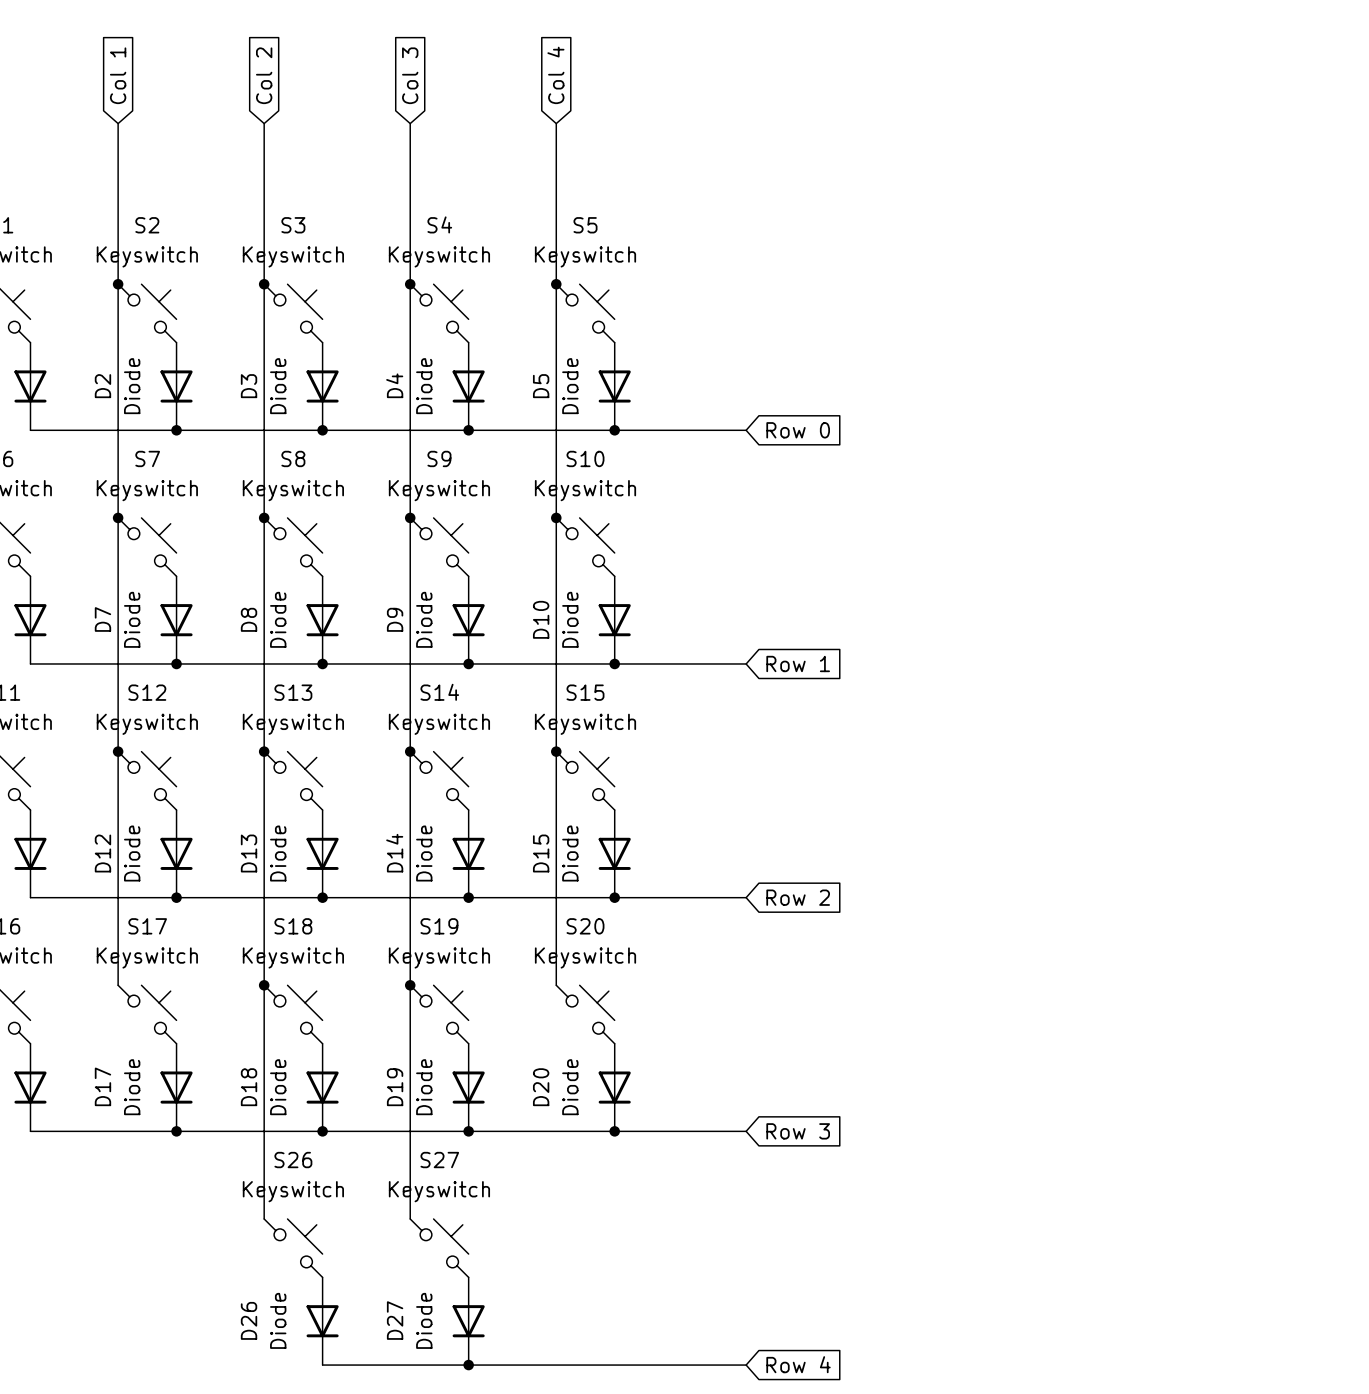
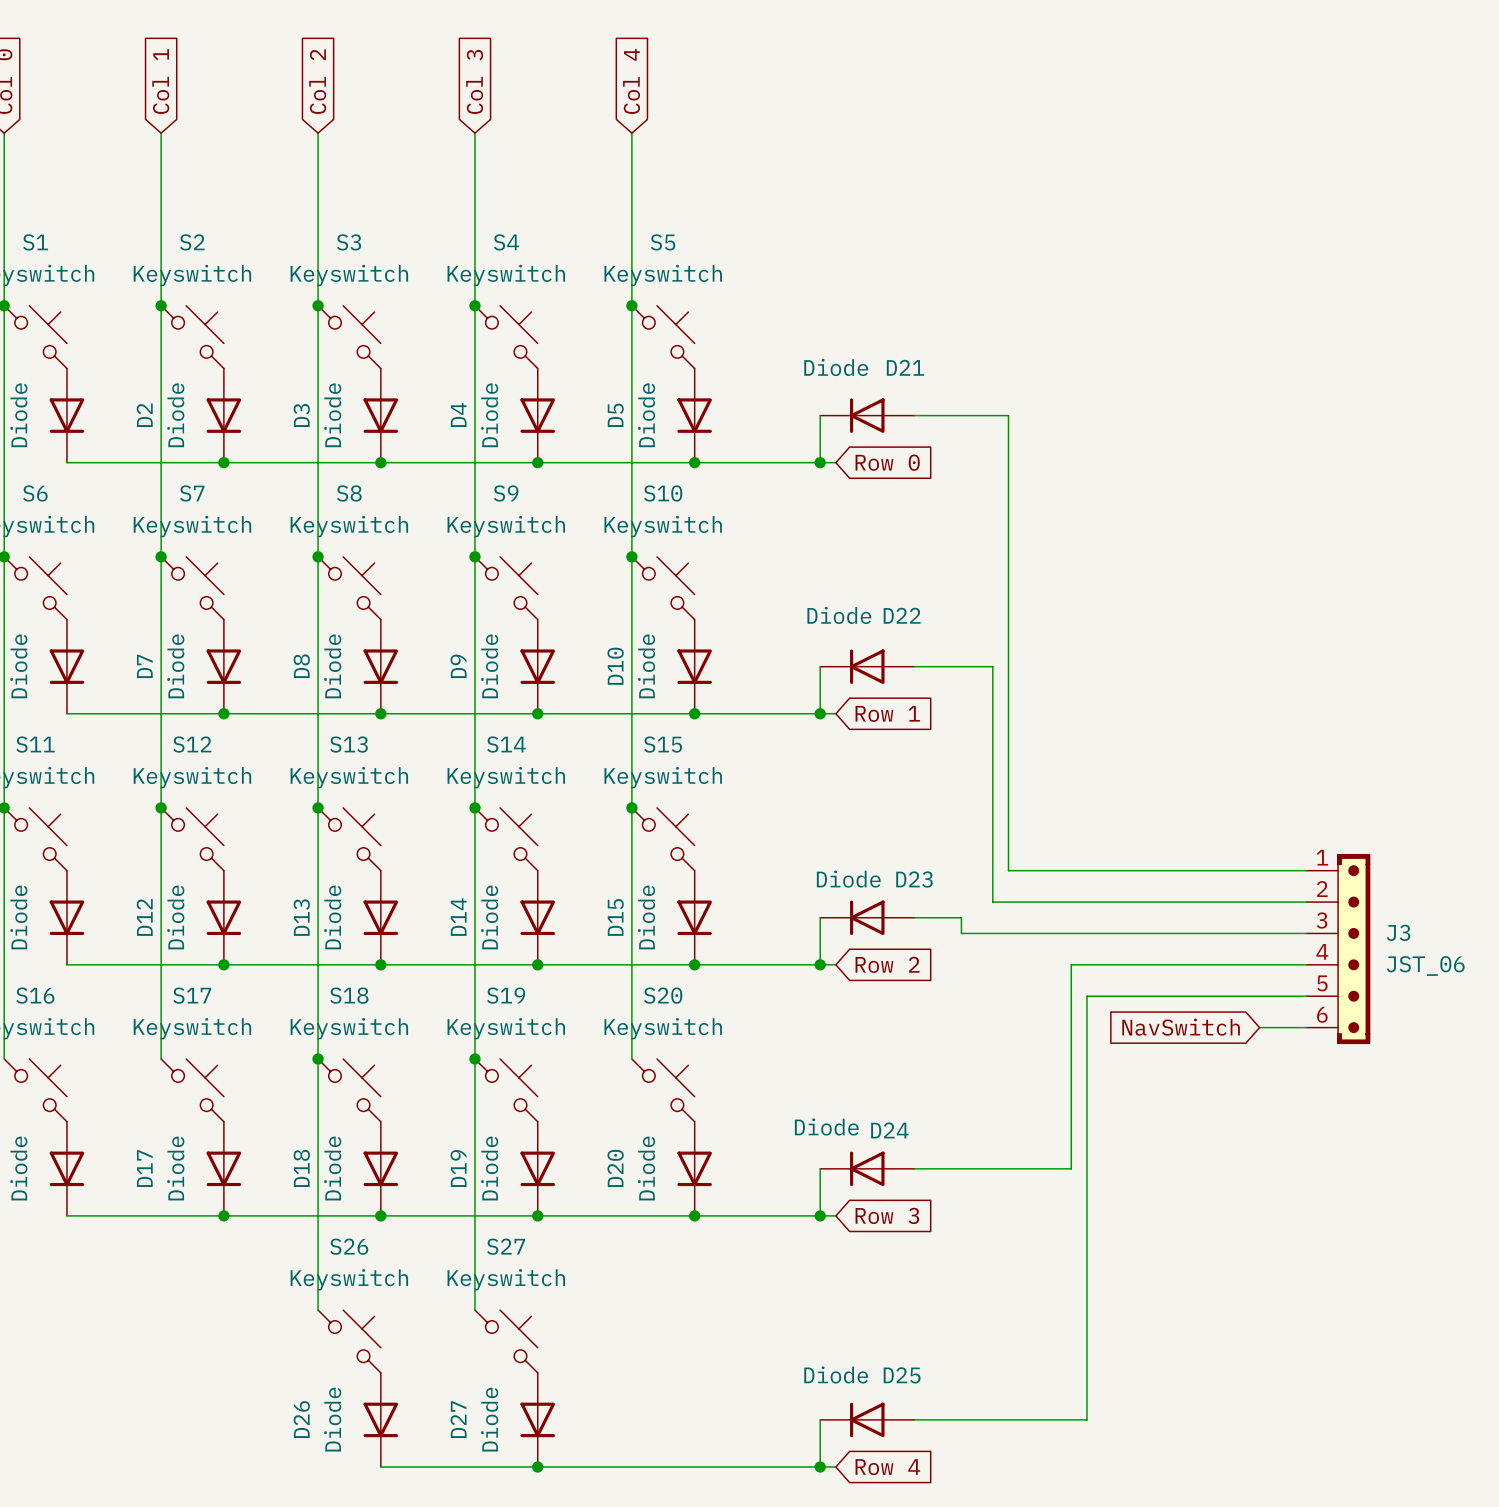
wire: none -> (820, 415) (820, 462)
D21: none -> Diode (867, 415)
wire: none -> (914, 415) (1008, 415) (1008, 870) (1306, 870)
junction: none -> (820, 462)
wire: none -> (820, 666) (820, 713)
D22: none -> Diode (867, 666)
wire: none -> (914, 666) (992, 666) (992, 902) (1306, 902)
junction: none -> (820, 713)
wire: none -> (820, 917) (820, 964)
D23: none -> Diode (867, 917)
wire: none -> (914, 917) (961, 917) (961, 933) (1306, 933)
J3: none -> JST_06 (1338, 949)
junction: none -> (820, 964)
wire: none -> (1306, 964) (1071, 964) (1071, 1168) (914, 1168)
wire: none -> (1306, 996) (1086, 996) (1086, 1419) (914, 1419)
global label: none -> NavSwitch (1181, 1027)
wire: none -> (1259, 1027) (1306, 1027)
wire: none -> (820, 1168) (820, 1215)
D24: none -> Diode (867, 1168)
junction: none -> (820, 1215)
wire: none -> (820, 1419) (820, 1466)
D25: none -> Diode (867, 1419)
junction: none -> (820, 1466)

